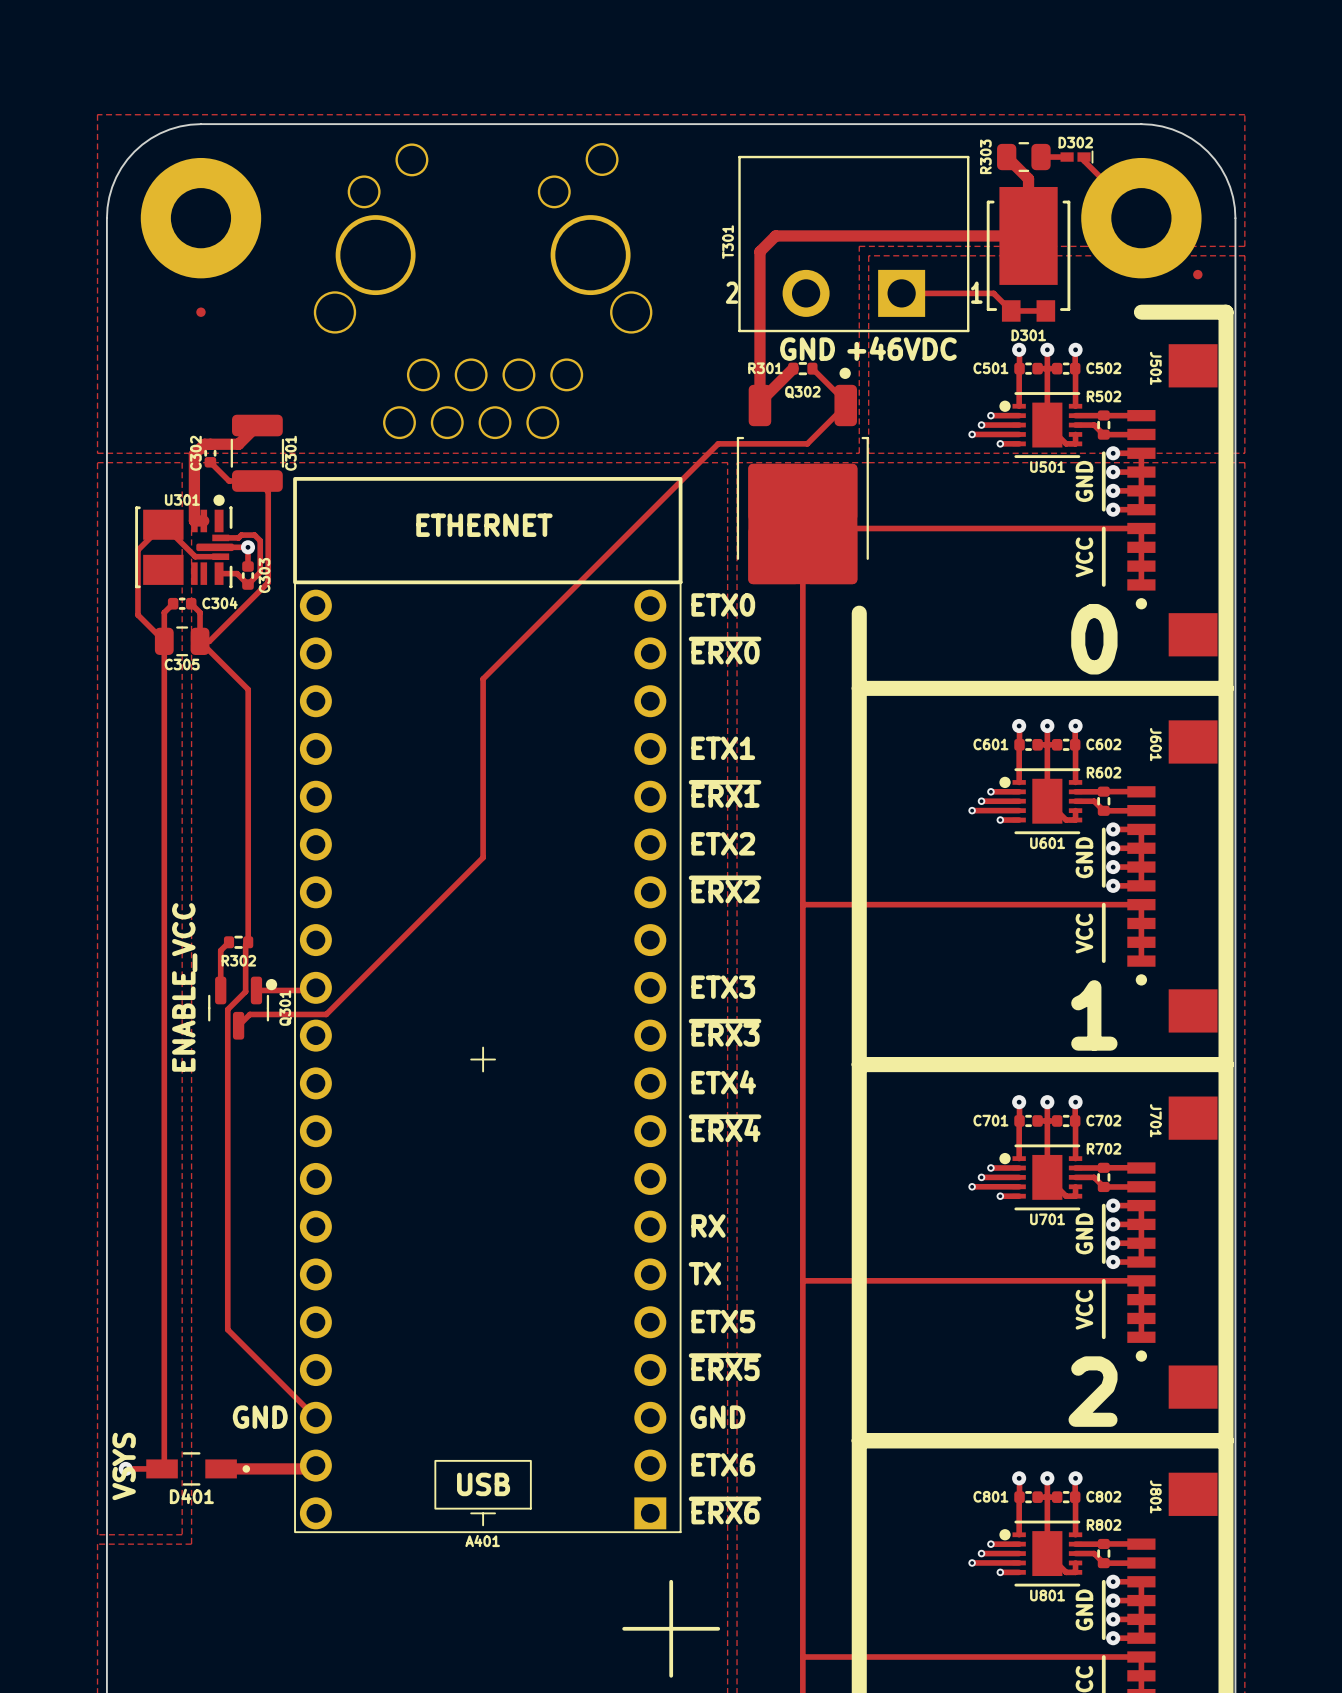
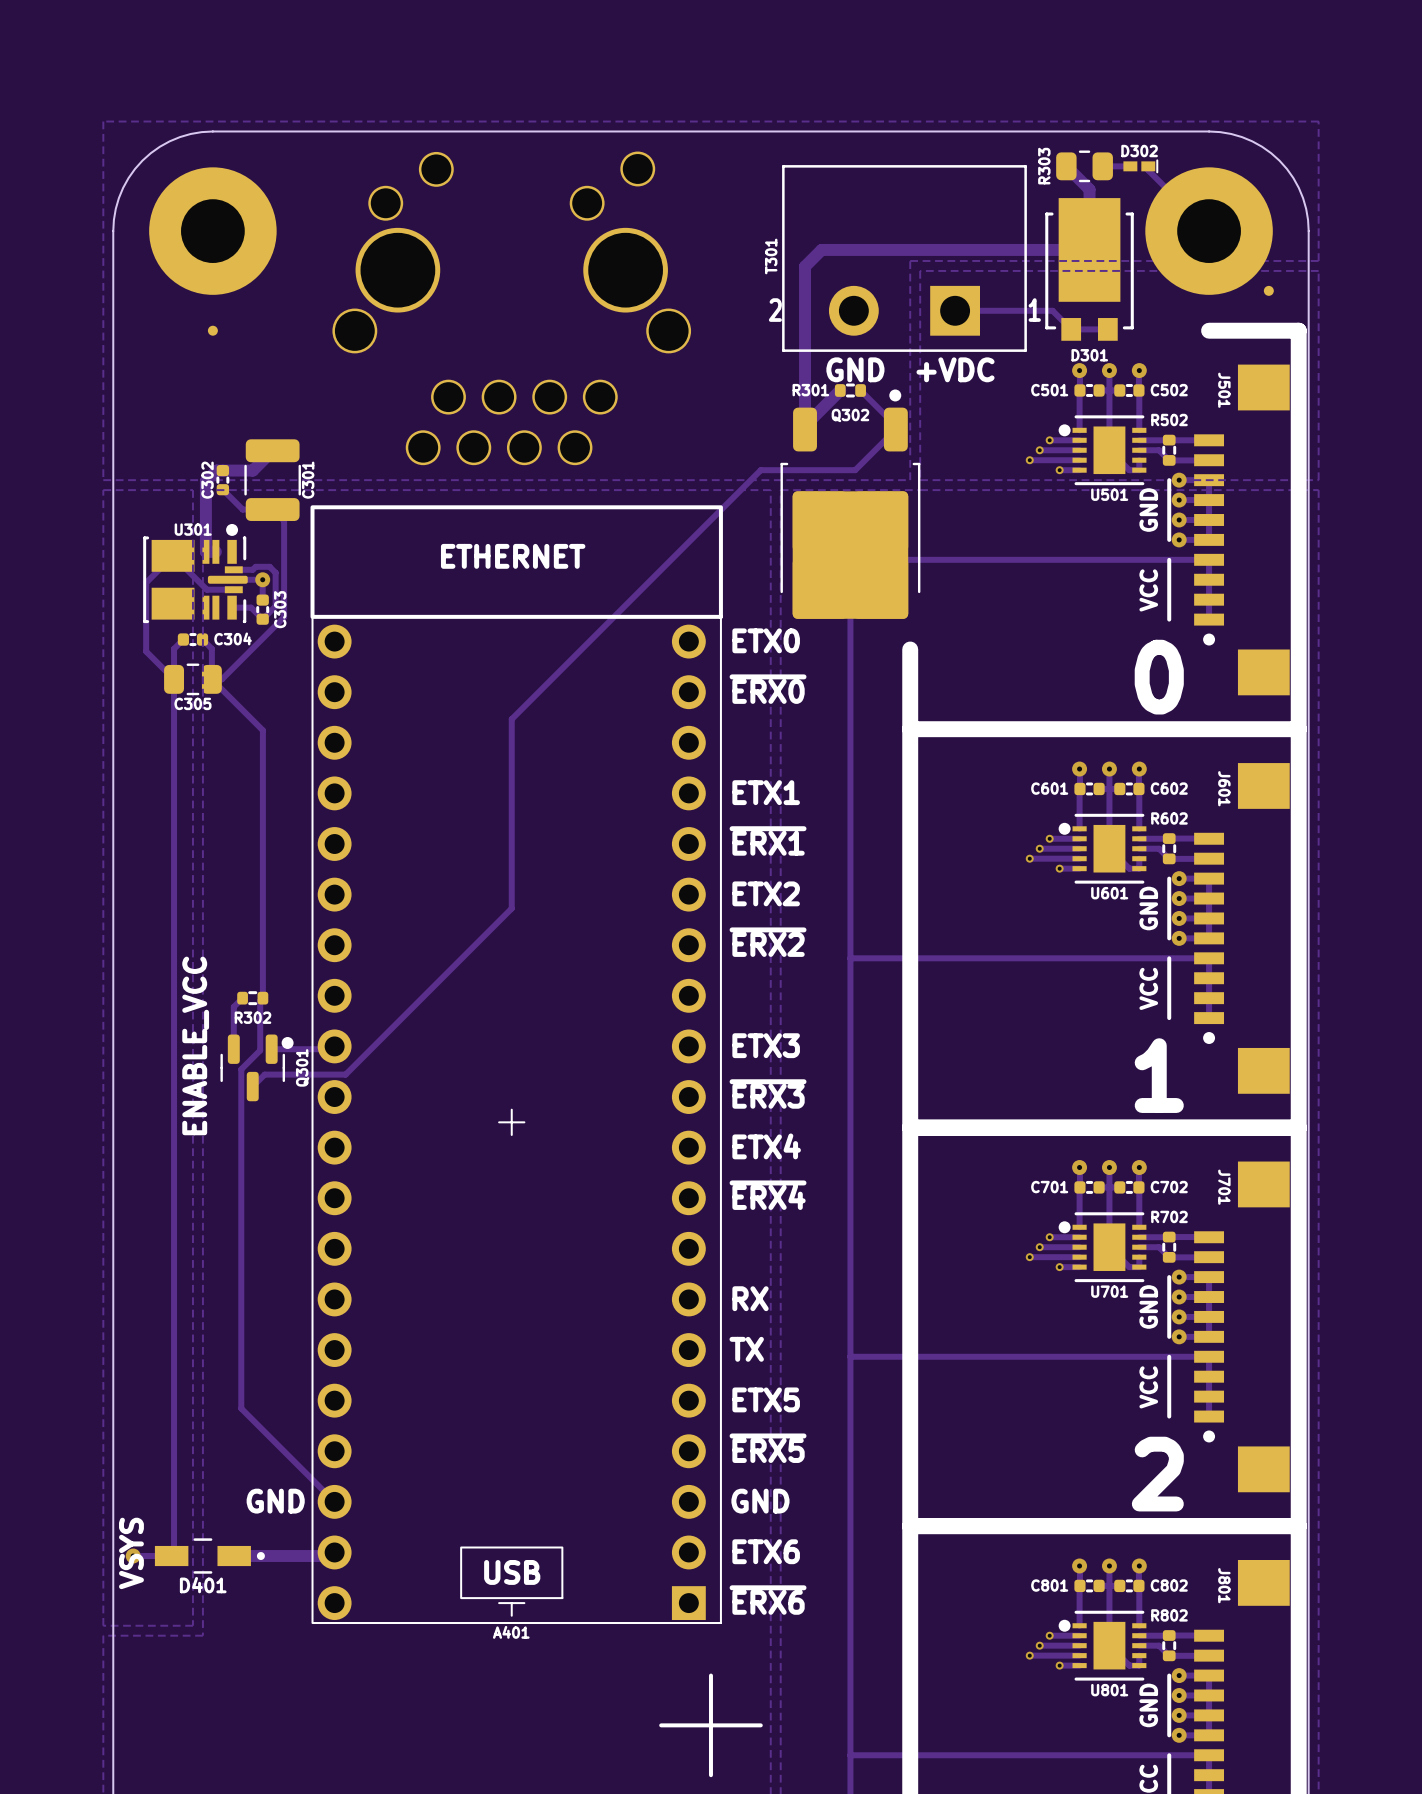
text: +46VDC (902, 348) -> +VDC (955, 369)

